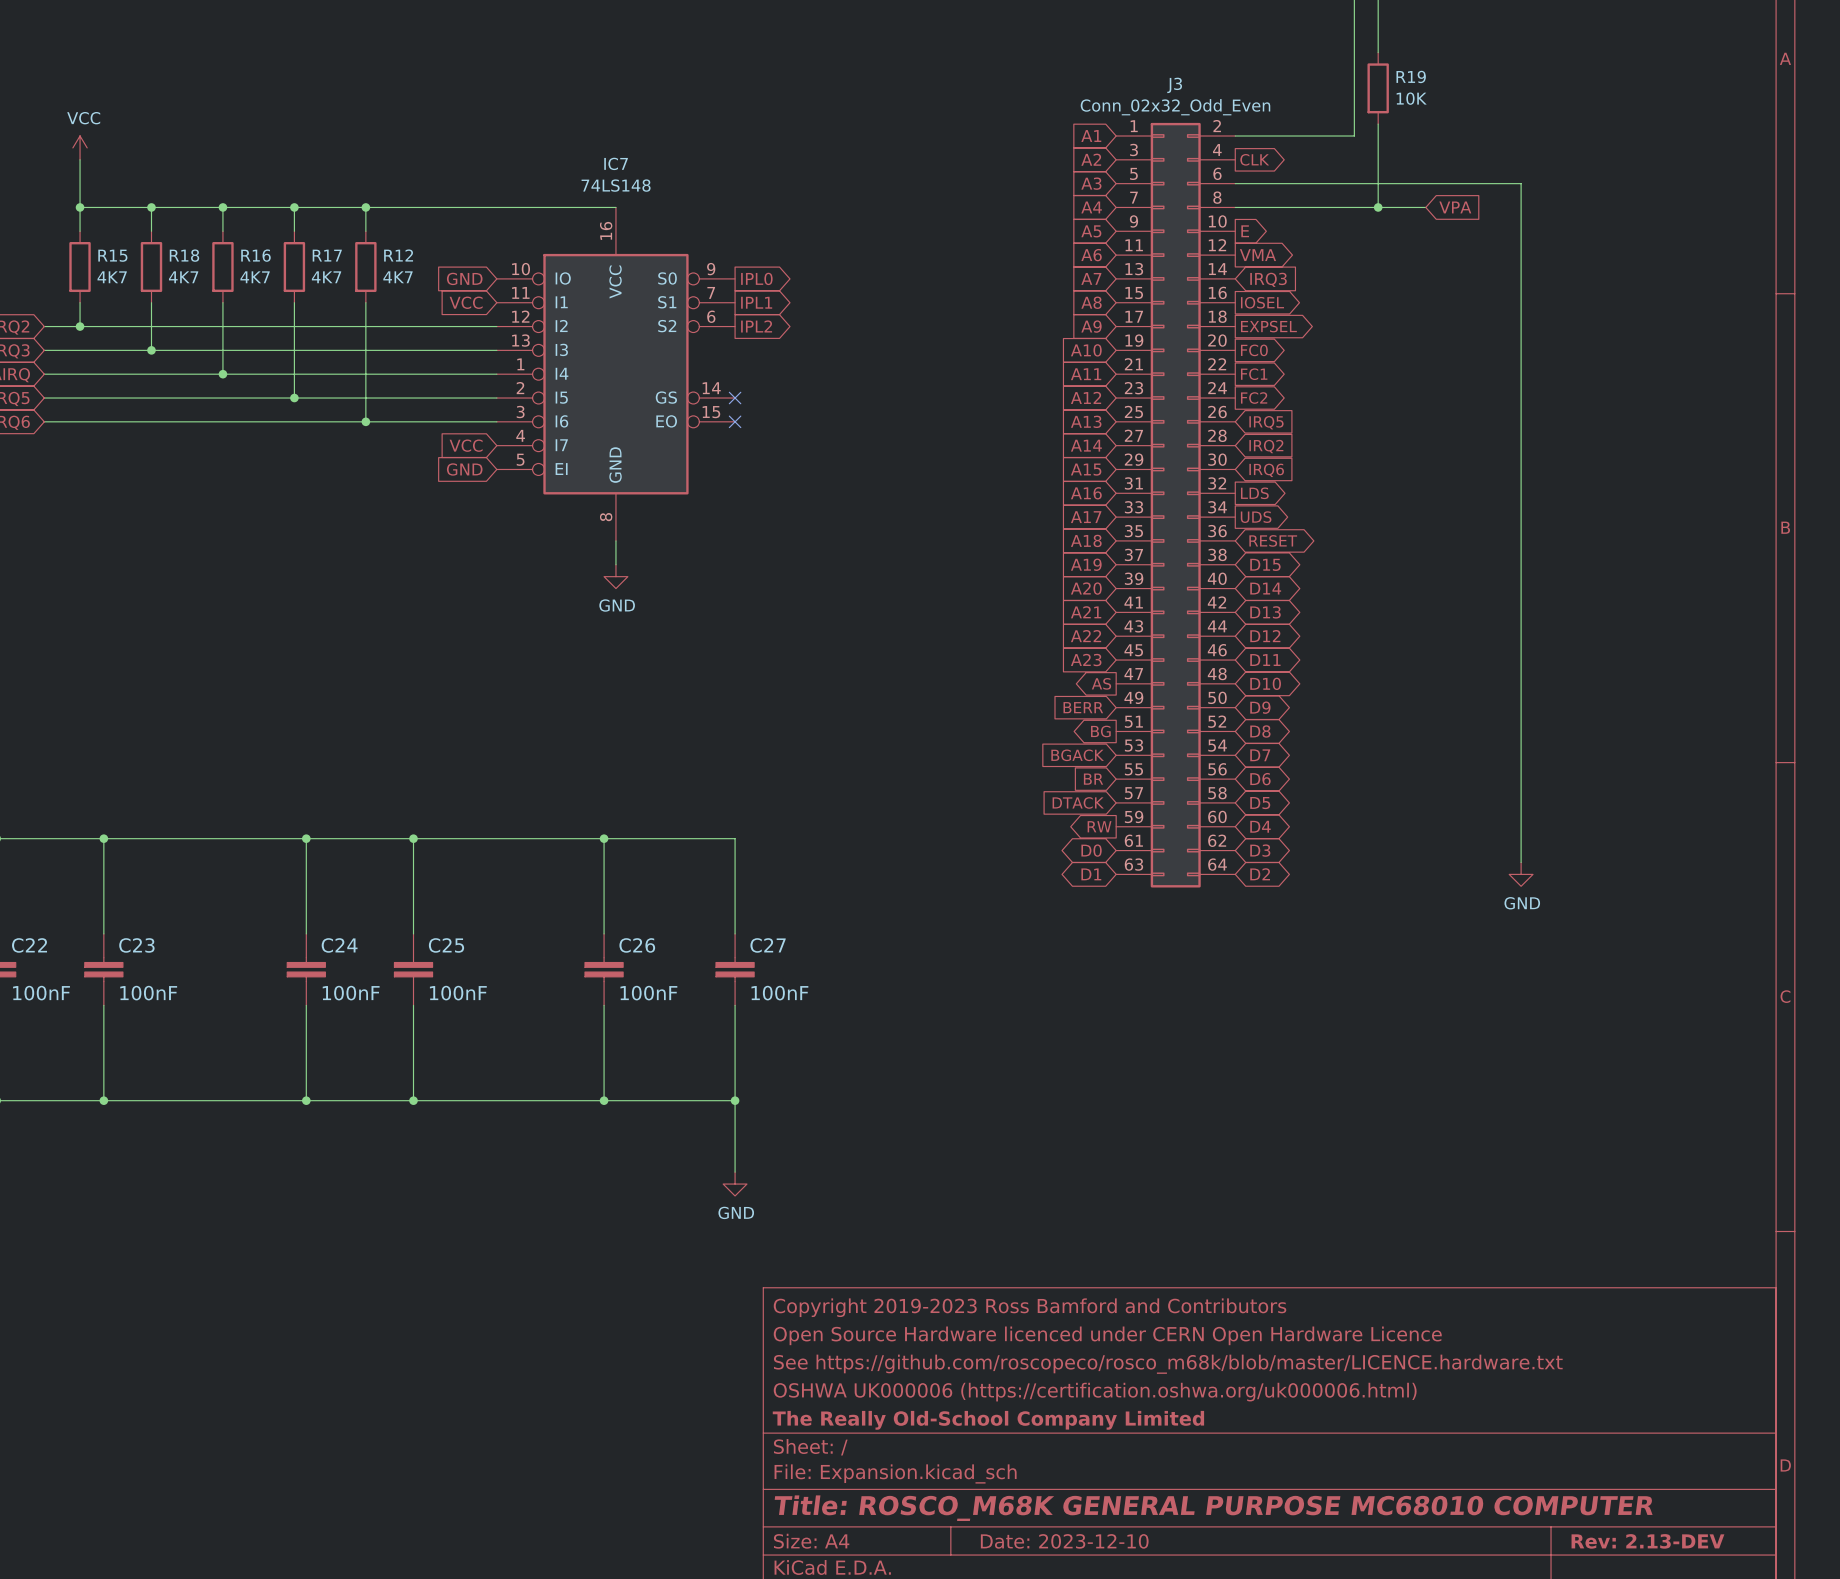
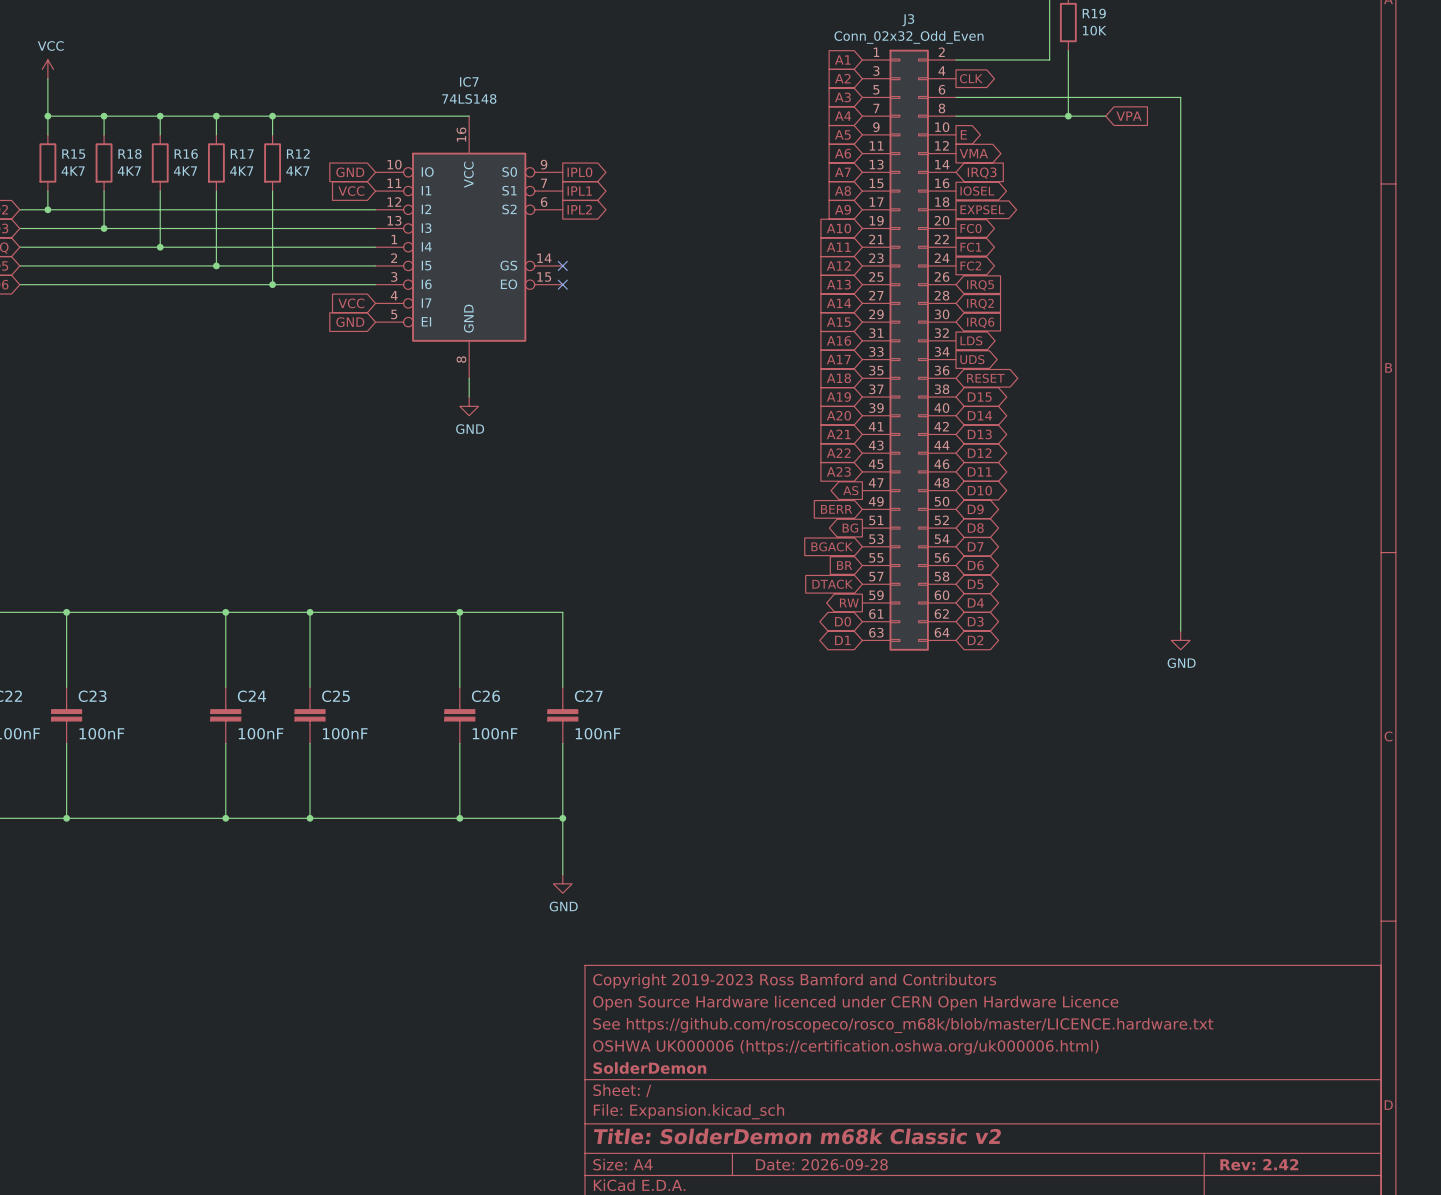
title block: The Really Old-School Company Limited (988, 1420) -> SolderDemon (649, 1068)
title block: Title: ROSCO_M68K GENERAL PURPOSE MC68010 COMPUTER (1213, 1508) -> Title: SolderDemon m68k Classic v2 (797, 1136)
title block: Date: 2023-12-10 (1064, 1541) -> Date: 2026-09-28 (821, 1164)
title block: Rev: 2.13-DEV (1647, 1541) -> Rev: 2.42 (1259, 1164)

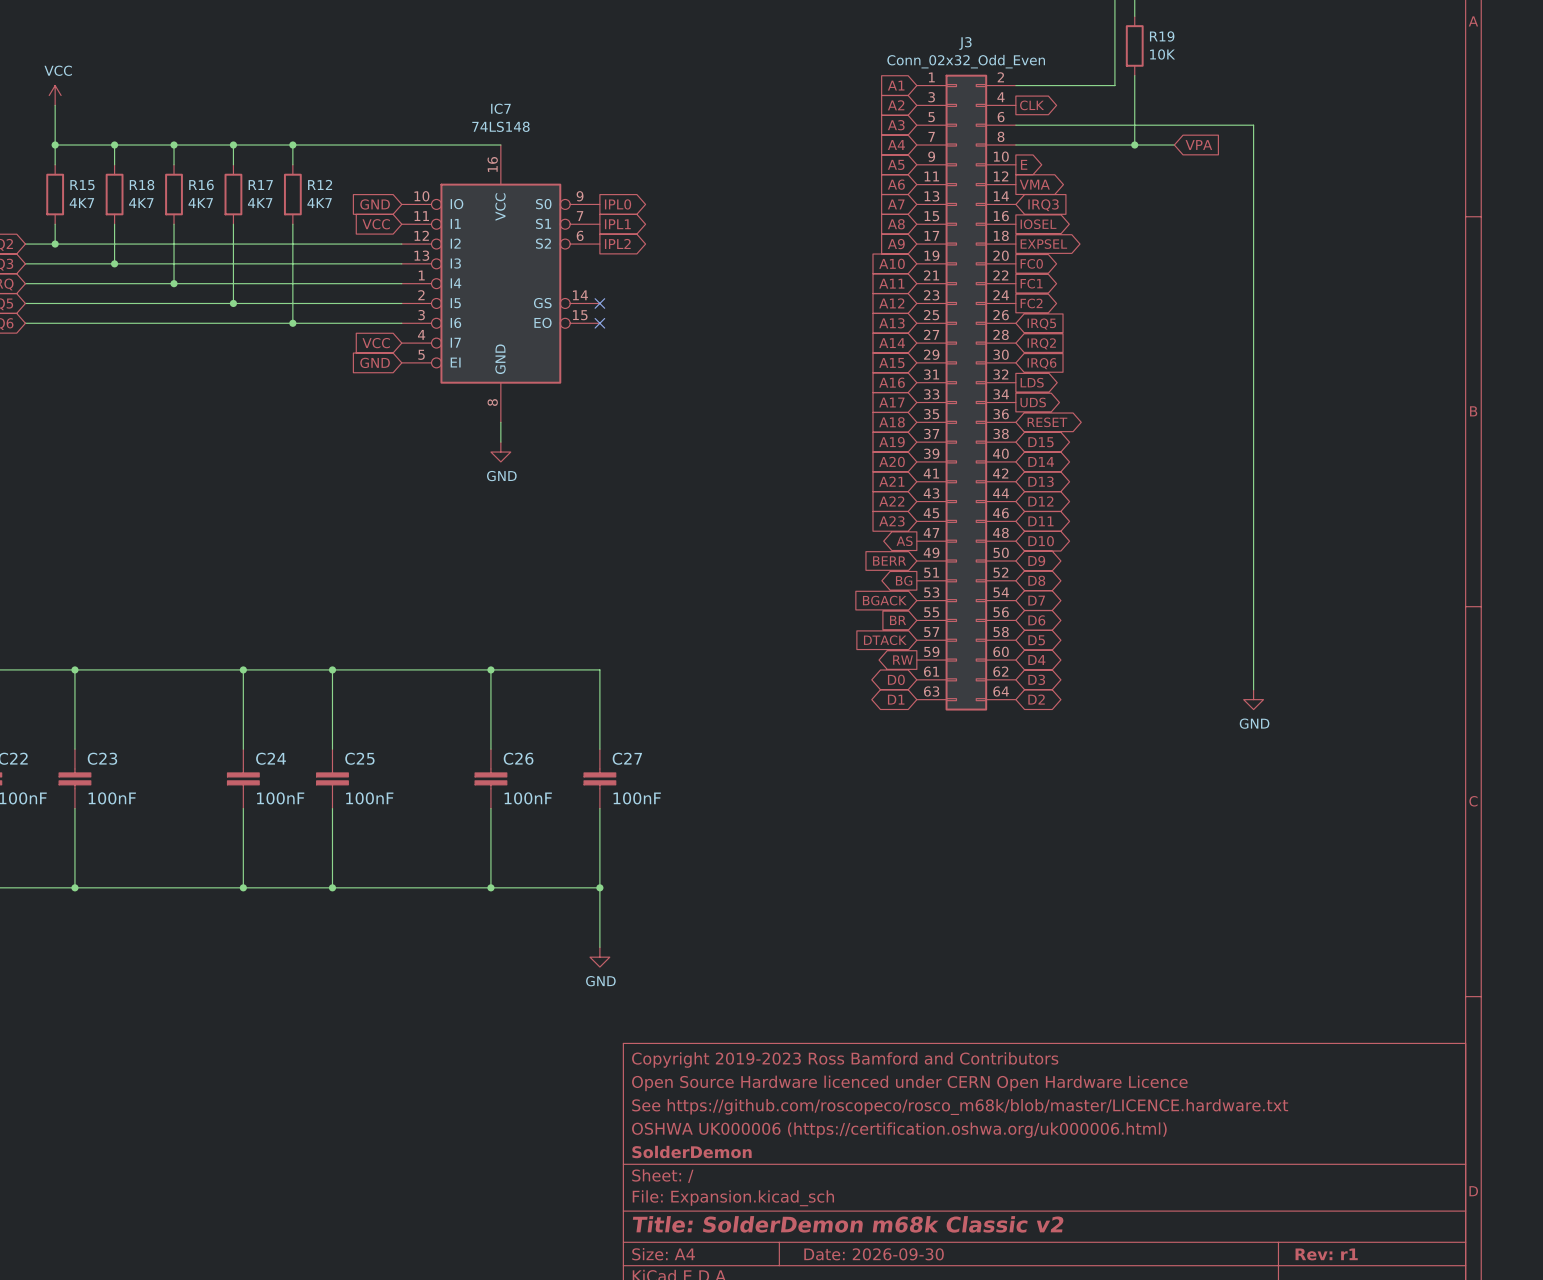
title block: Date: 2026-09-28 (821, 1164) -> Date: 2026-09-30 (874, 1254)
title block: Rev: 2.42 (1259, 1164) -> Rev: r1 (1326, 1254)

